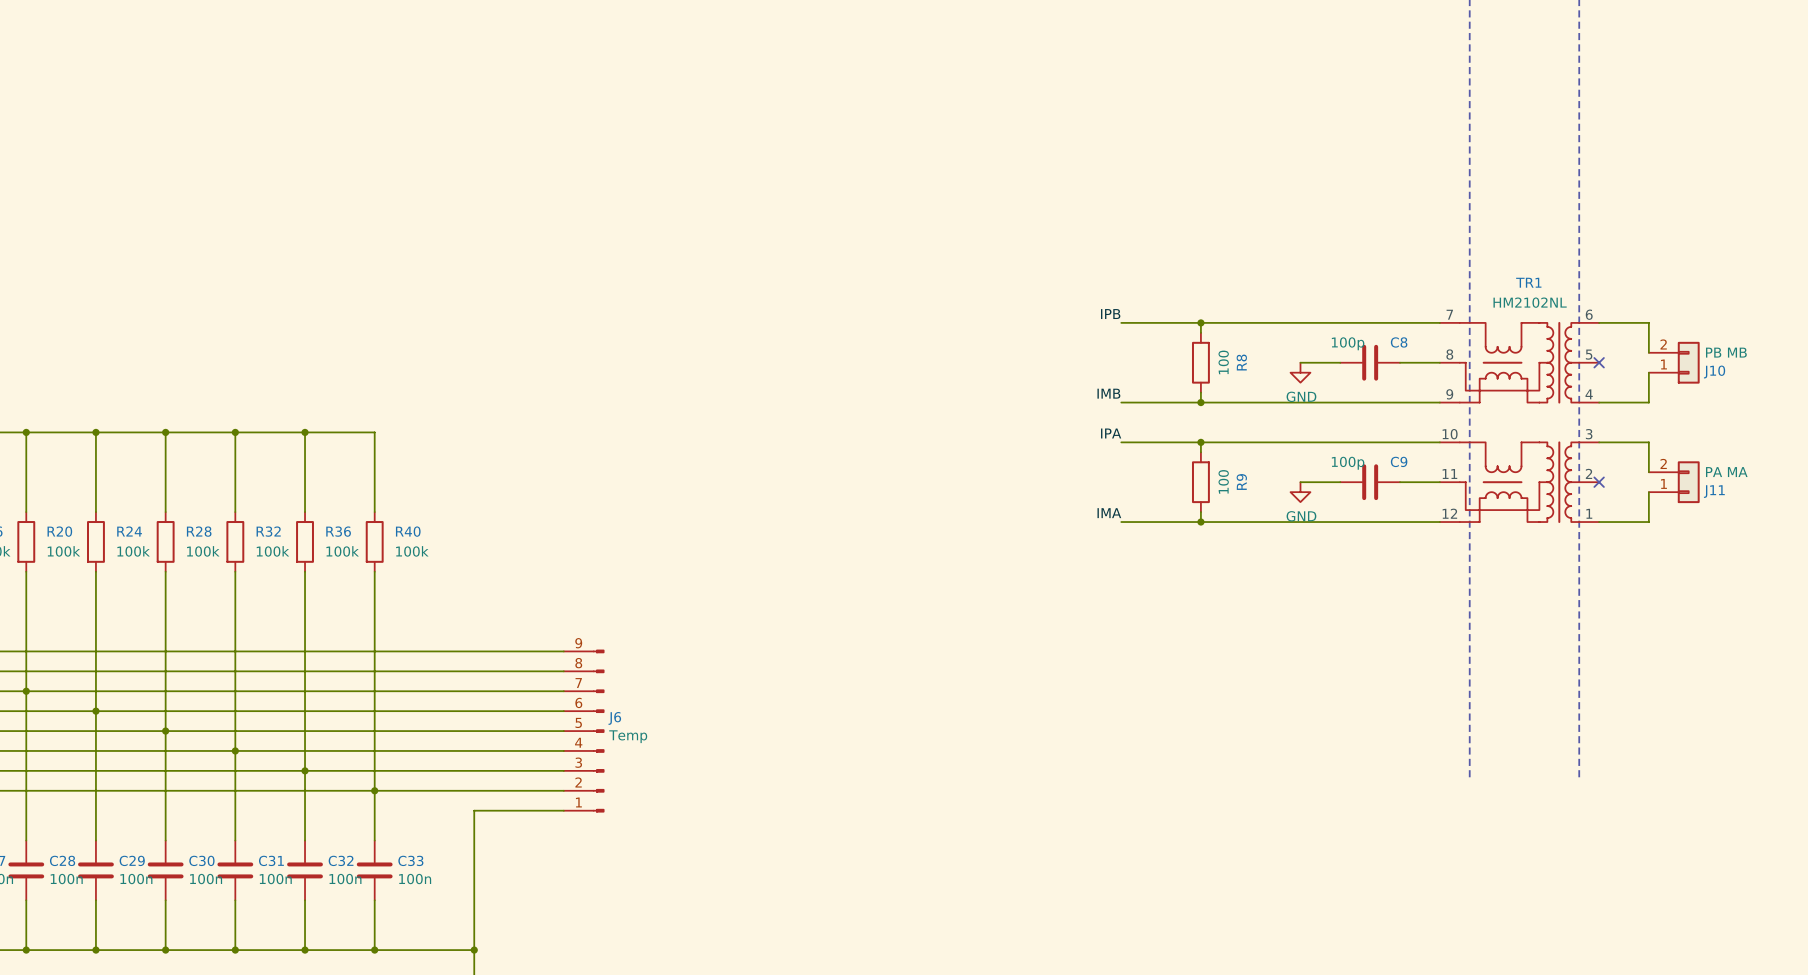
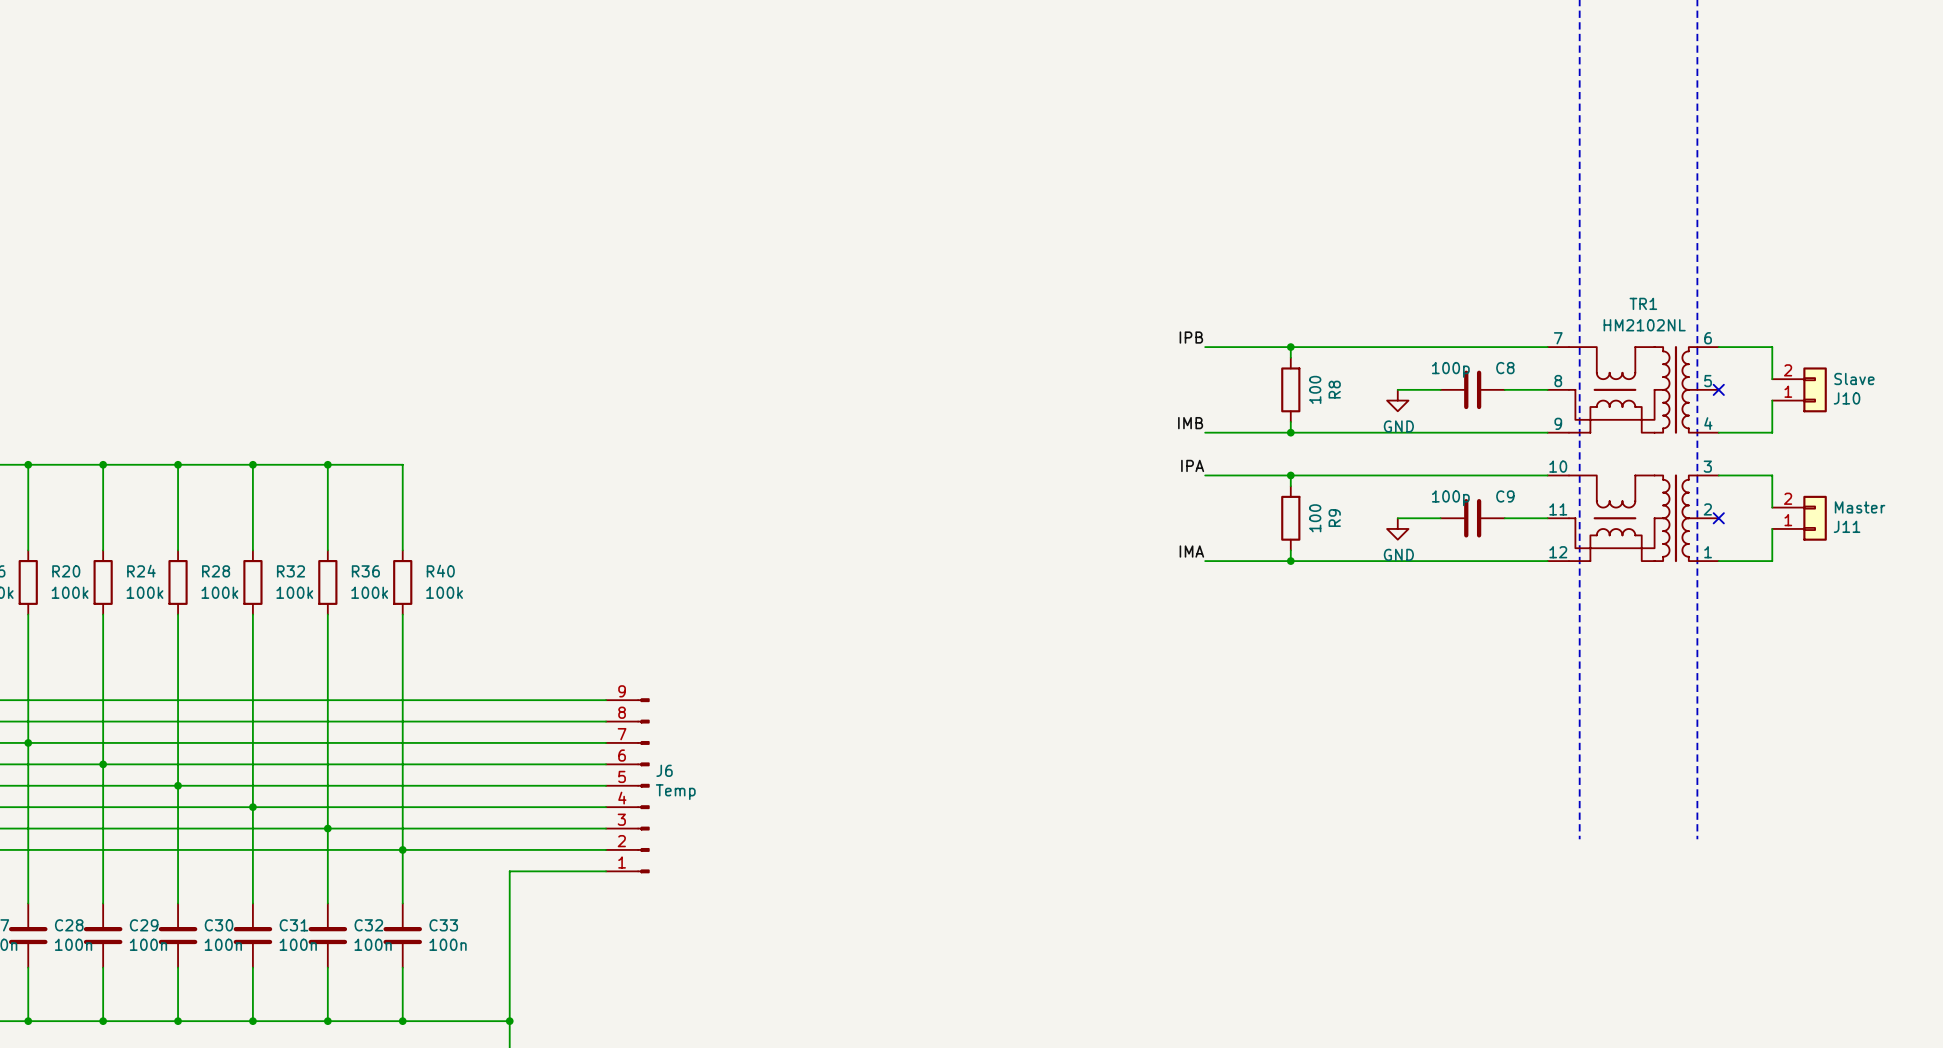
J10 value: PB MB (1726, 352) -> Slave (1854, 378)
J11 value: PA MA (1726, 472) -> Master (1860, 507)

